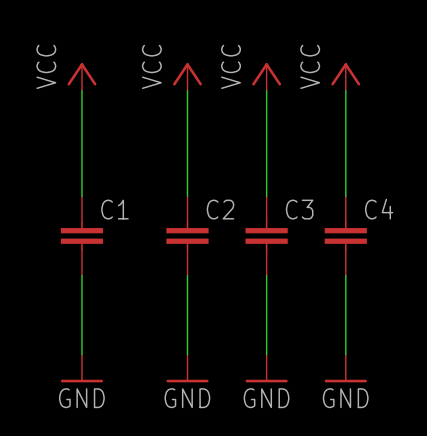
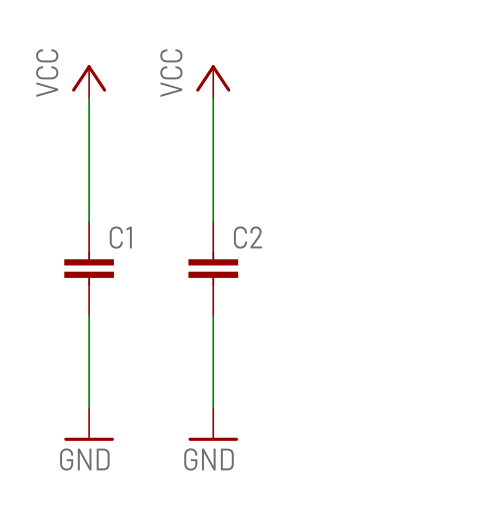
power symbol: VCC (266, 76) -> none
power symbol: VCC (345, 76) -> none
wire: (266, 90) (266, 196) -> none
wire: (345, 90) (345, 196) -> none
C3: (266, 235) -> none
C4: (345, 235) -> none
wire: (266, 275) (266, 354) -> none
wire: (345, 275) (345, 354) -> none
power symbol: GND (266, 368) -> none
power symbol: GND (345, 368) -> none

